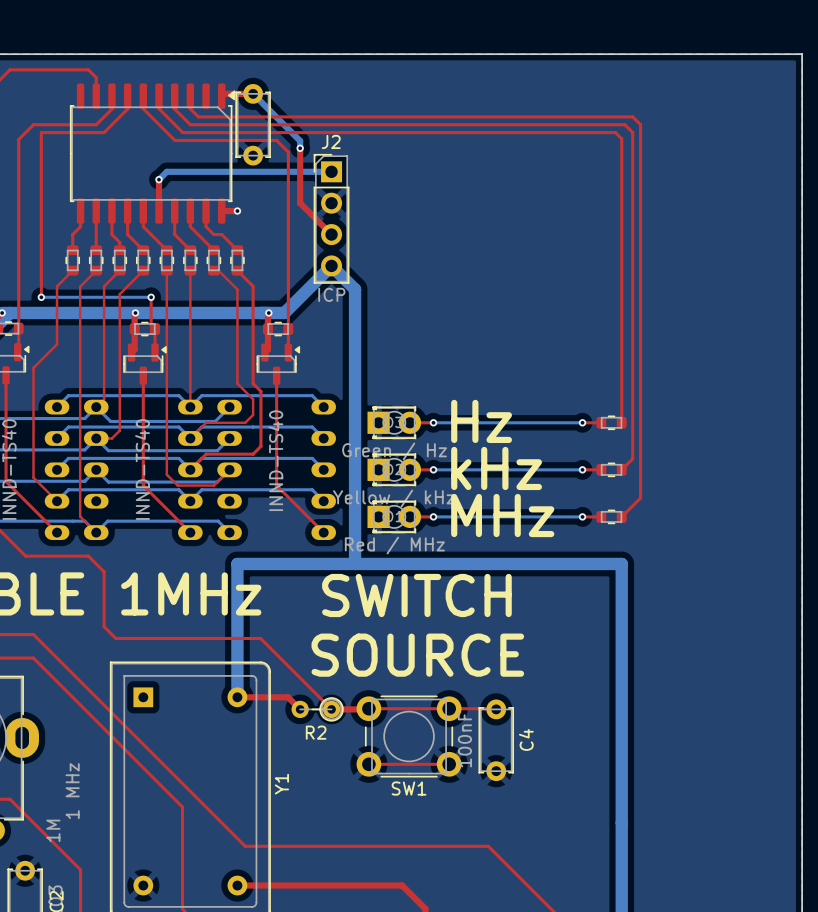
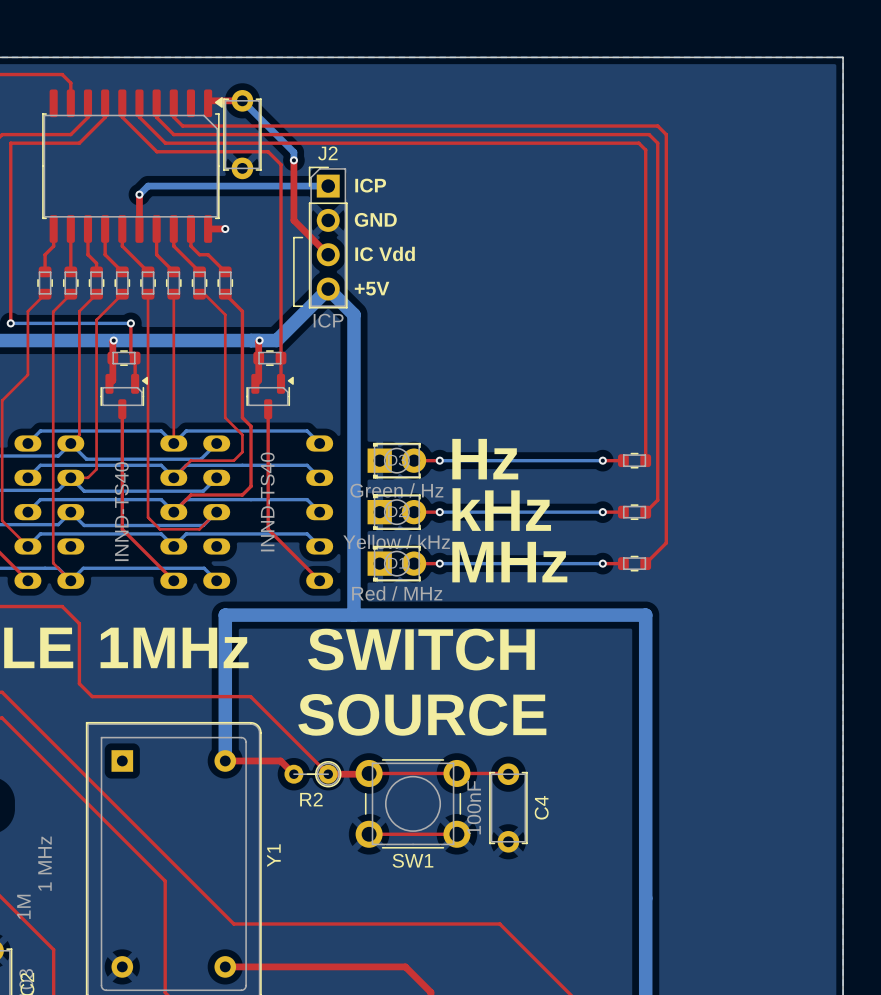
text: none -> ICP (370, 185)
text: none -> GND (375, 219)
line: none -> (302, 237) (293, 237) (293, 306) (302, 306)
text: none -> IC Vdd (385, 253)
text: none -> +5V (372, 288)

